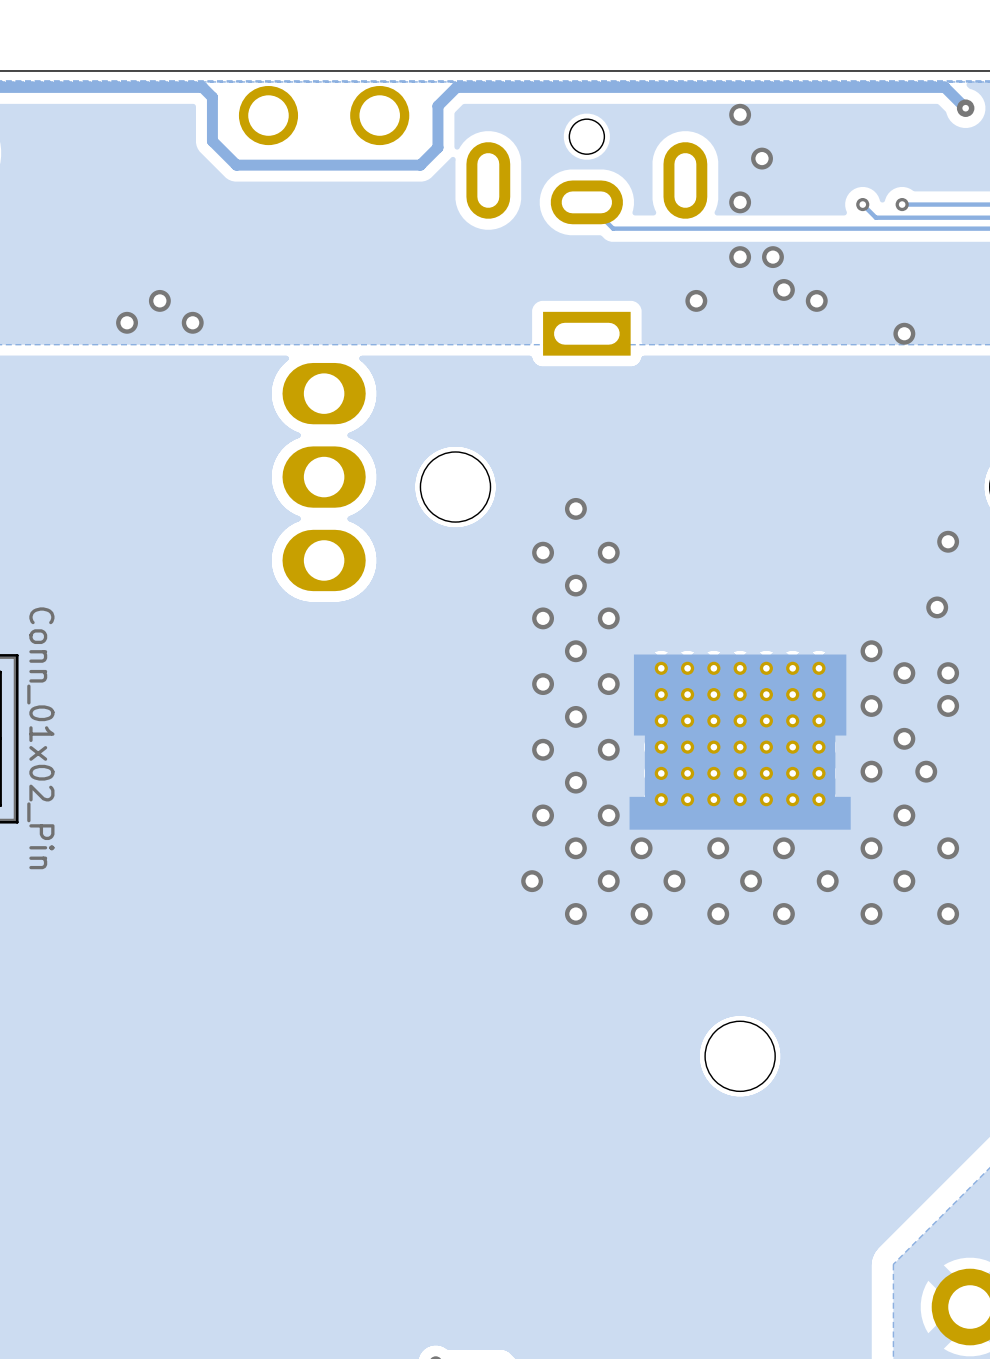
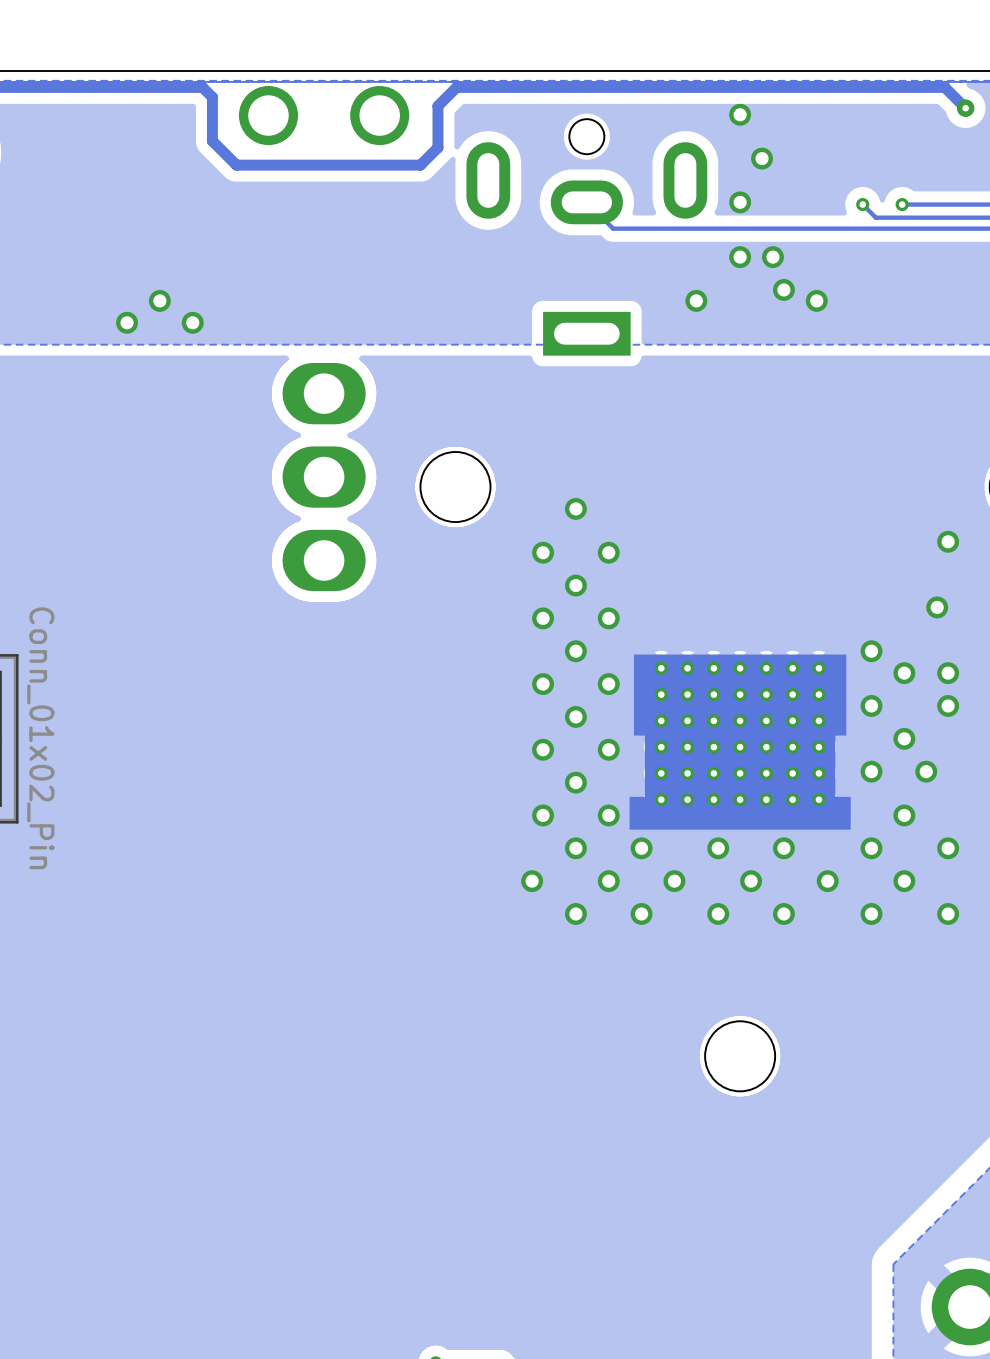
via: (904, 333) -> none

